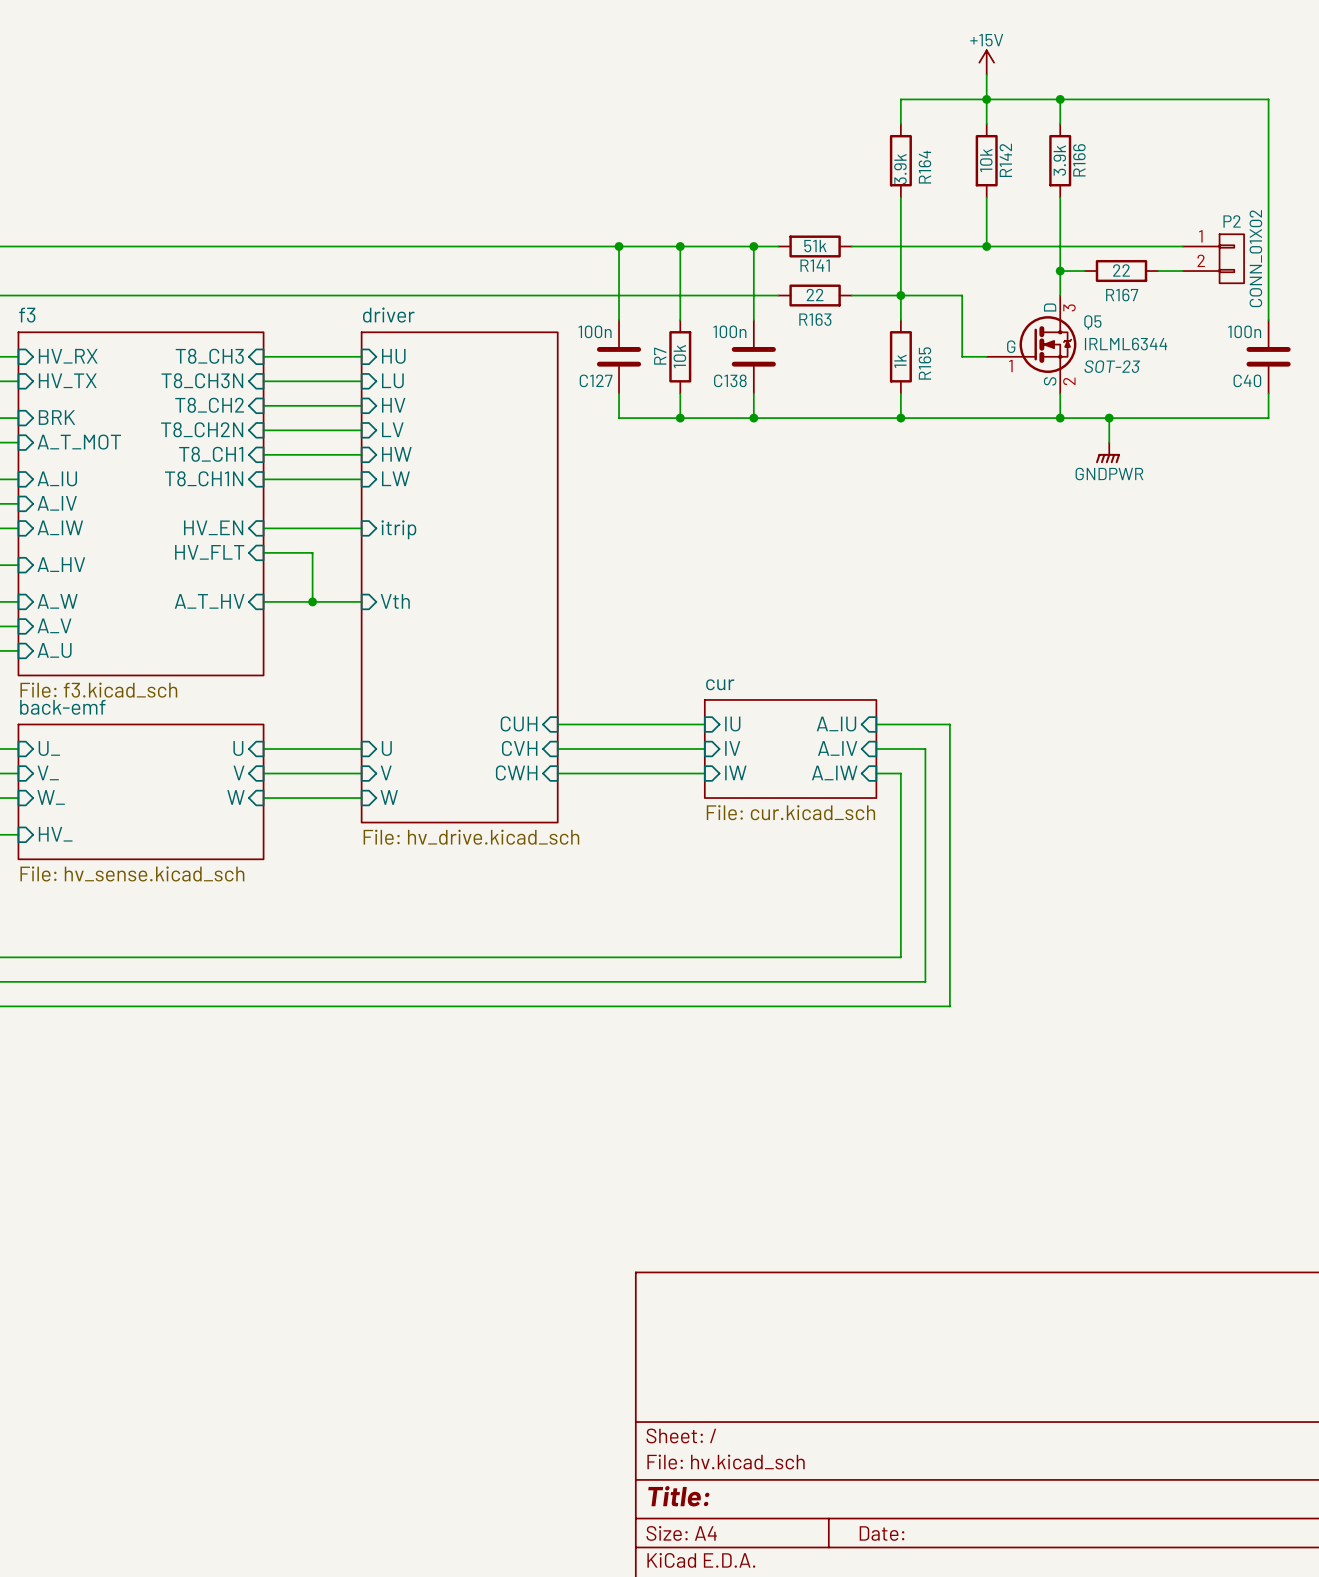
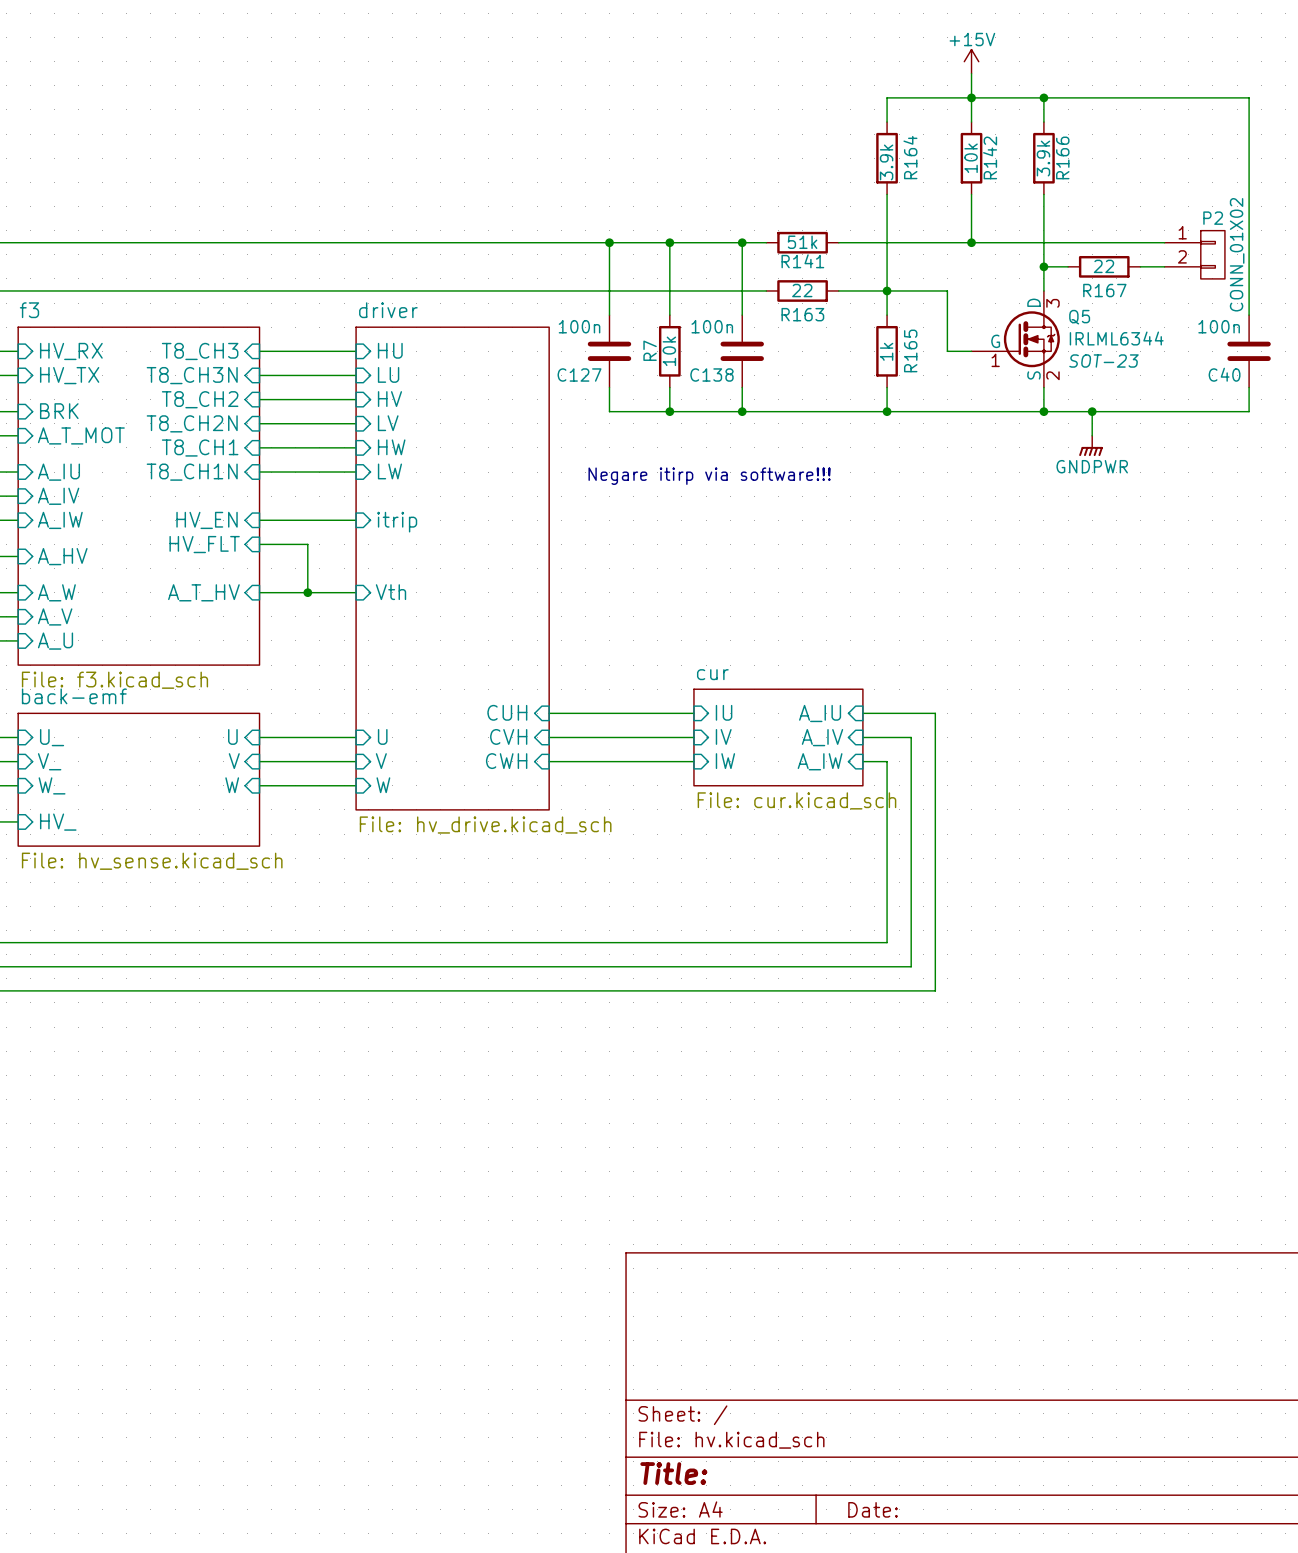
text: none -> Negare itirp via software!!! (709, 476)

